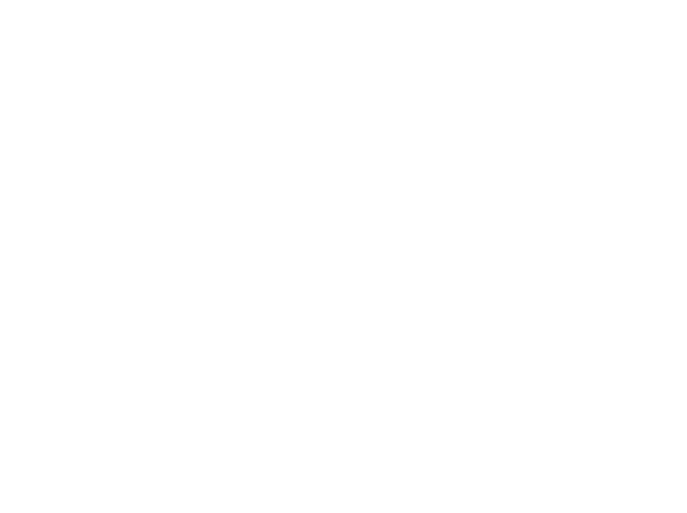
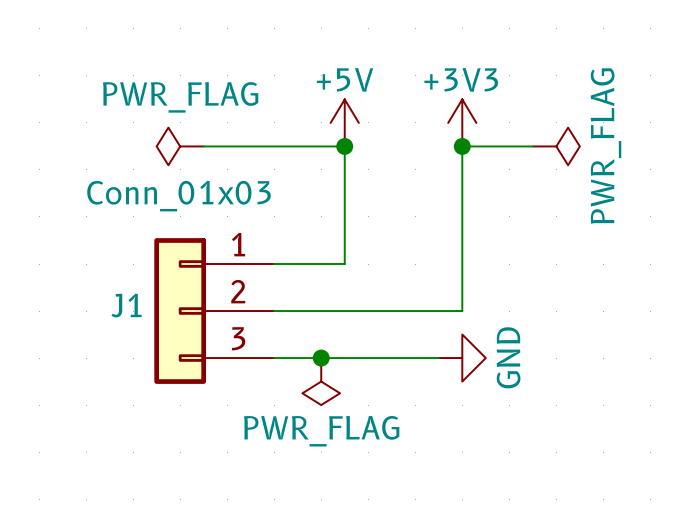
power symbol: none -> +5V (344, 122)
power symbol: none -> +3V3 (462, 122)
power symbol: none -> PWR_FLAG (180, 146)
wire: none -> (203, 146) (344, 146) (344, 264) (274, 264)
junction: none -> (344, 146)
junction: none -> (462, 146)
wire: none -> (532, 146) (462, 146) (462, 311) (274, 311)
power symbol: none -> PWR_FLAG (556, 146)
J1: none -> Conn_01x03 (214, 311)
wire: none -> (274, 358) (438, 358)
junction: none -> (321, 358)
power symbol: none -> GND (462, 358)
power symbol: none -> PWR_FLAG (321, 381)

